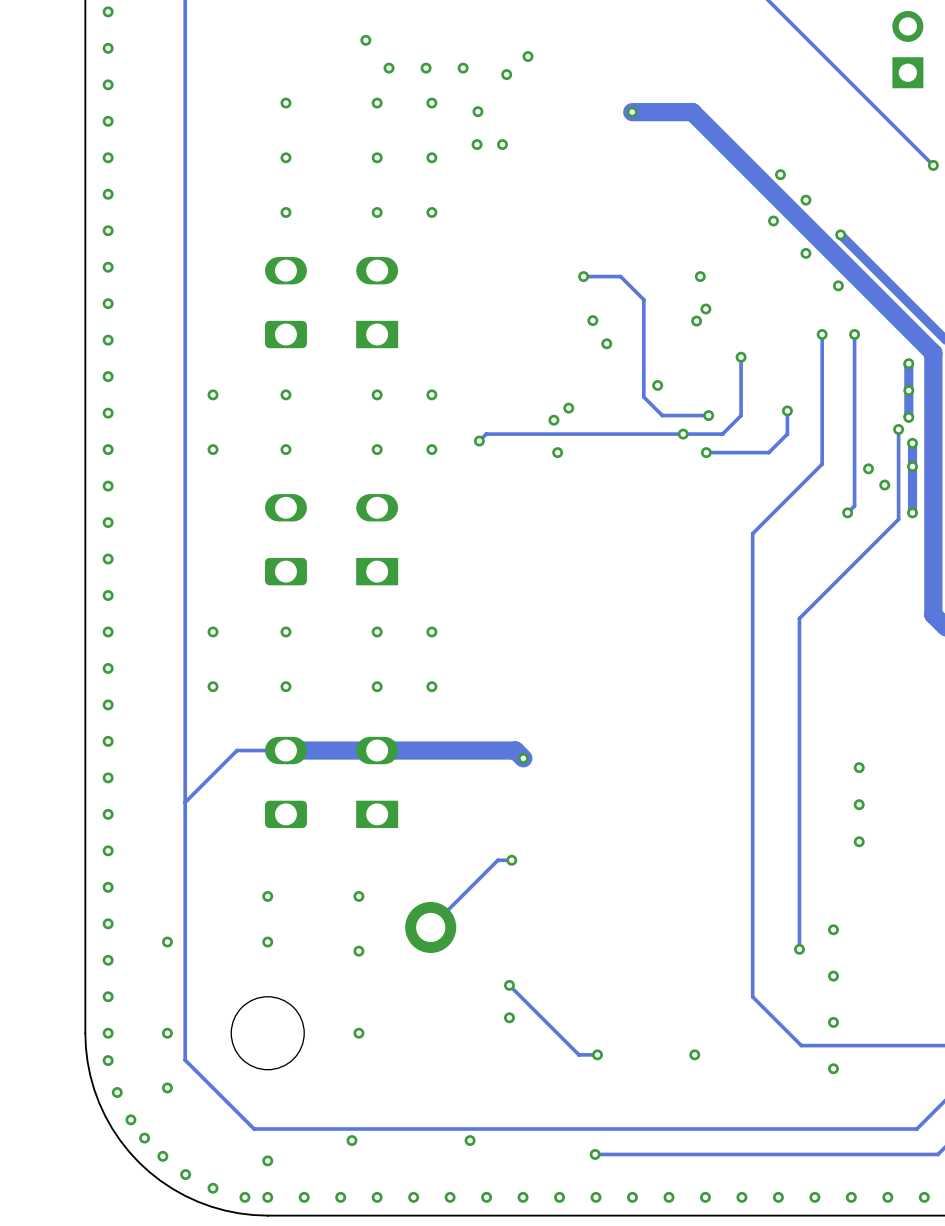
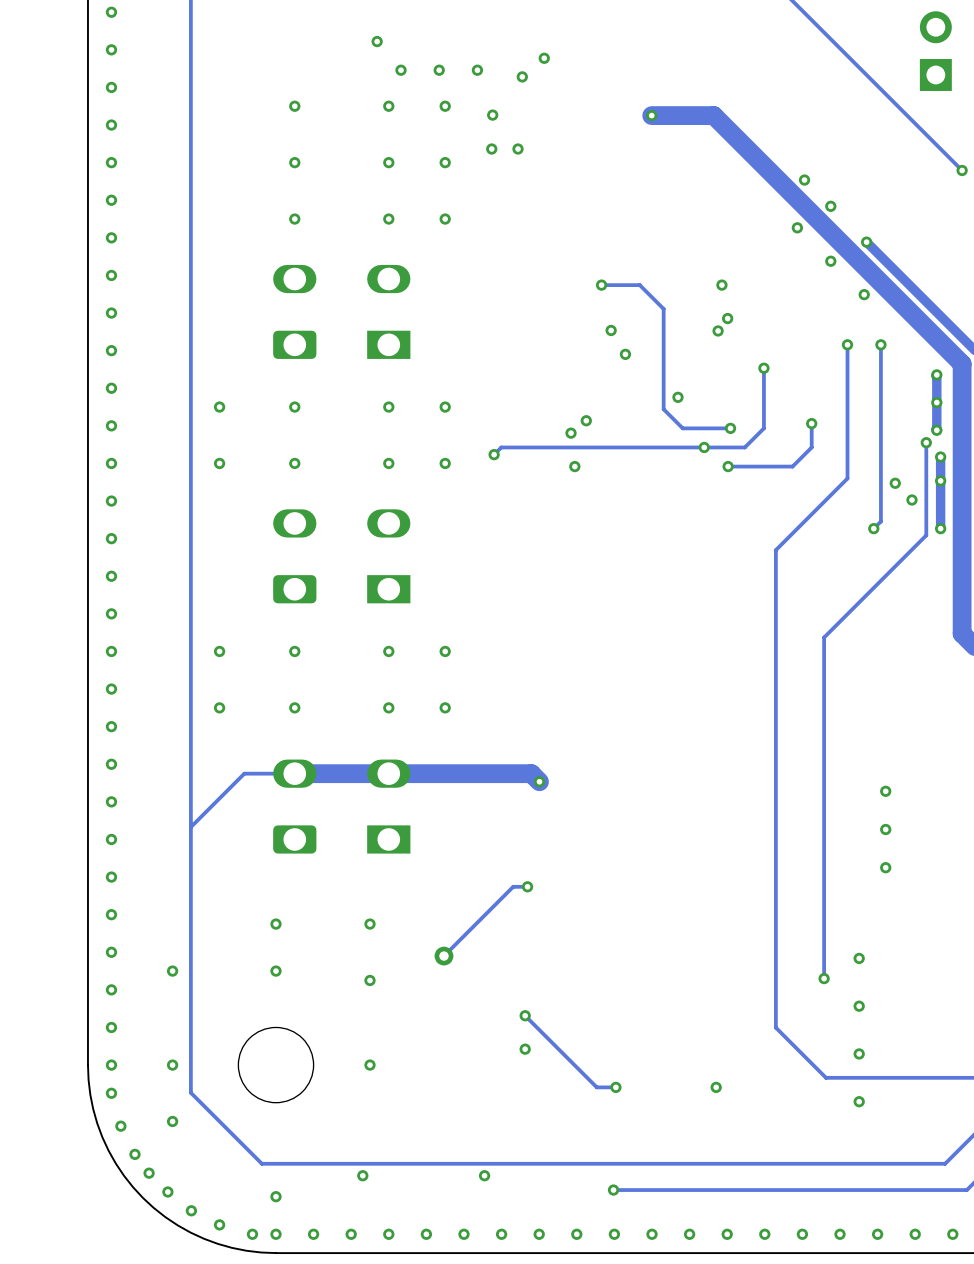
part footprint: [405, 901, 457, 954] -> [434, 946, 454, 966]

